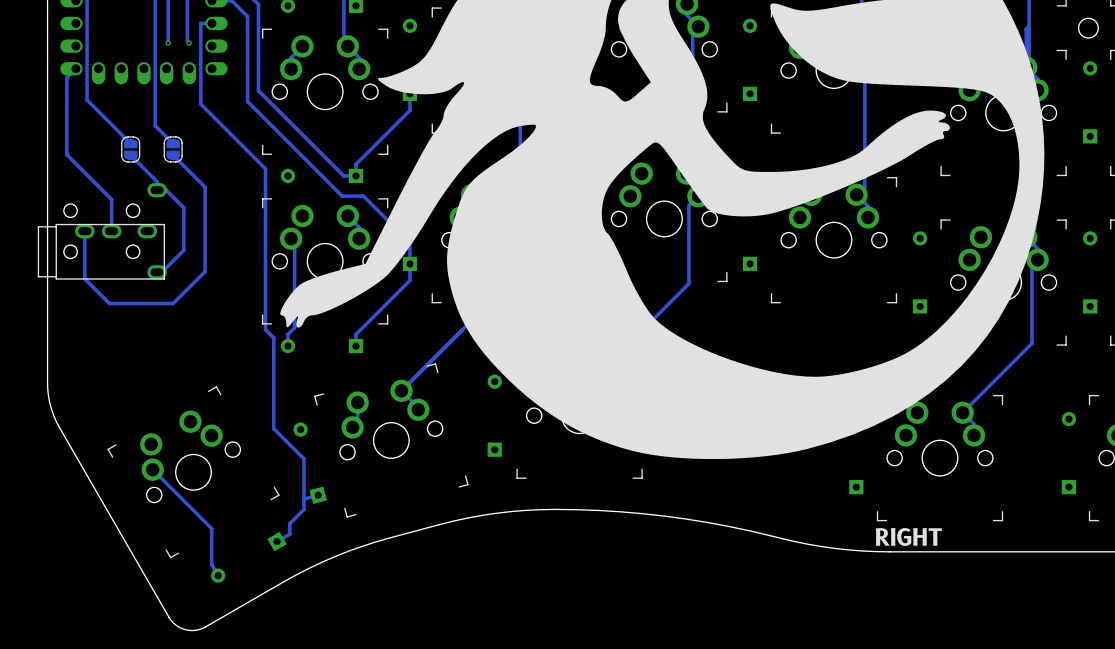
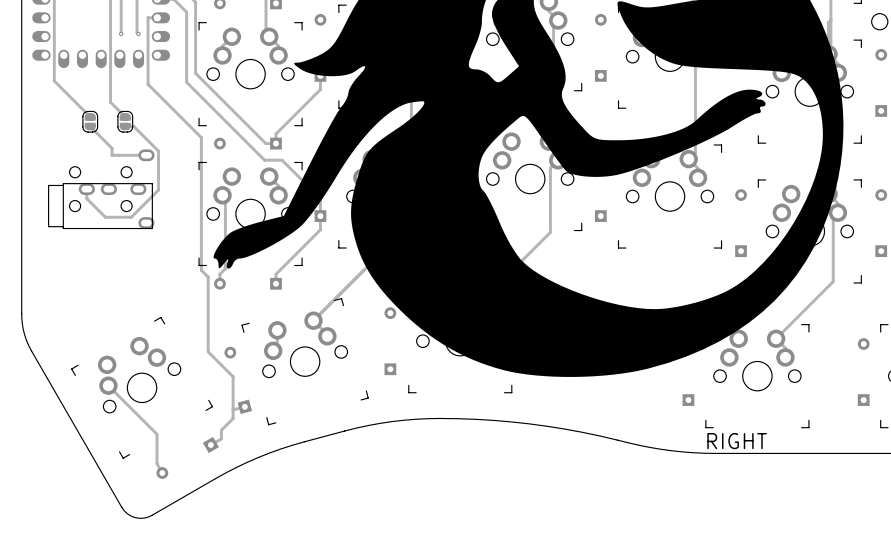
track: (75, 68) (66, 77) (66, 154) (111, 199) (111, 231) -> none
track: (173, 155) (205, 187) (205, 271) (173, 303) (109, 303) (84, 278) (84, 231) -> (125, 126) (133, 126) (158, 151) (158, 190) (131, 217) (105, 217) (86, 198) (86, 189)
track: (166, 190) (183, 207) (183, 250) (161, 272) -> (119, 155) (146, 155)
part position: (102, 231) -> (101, 189)

